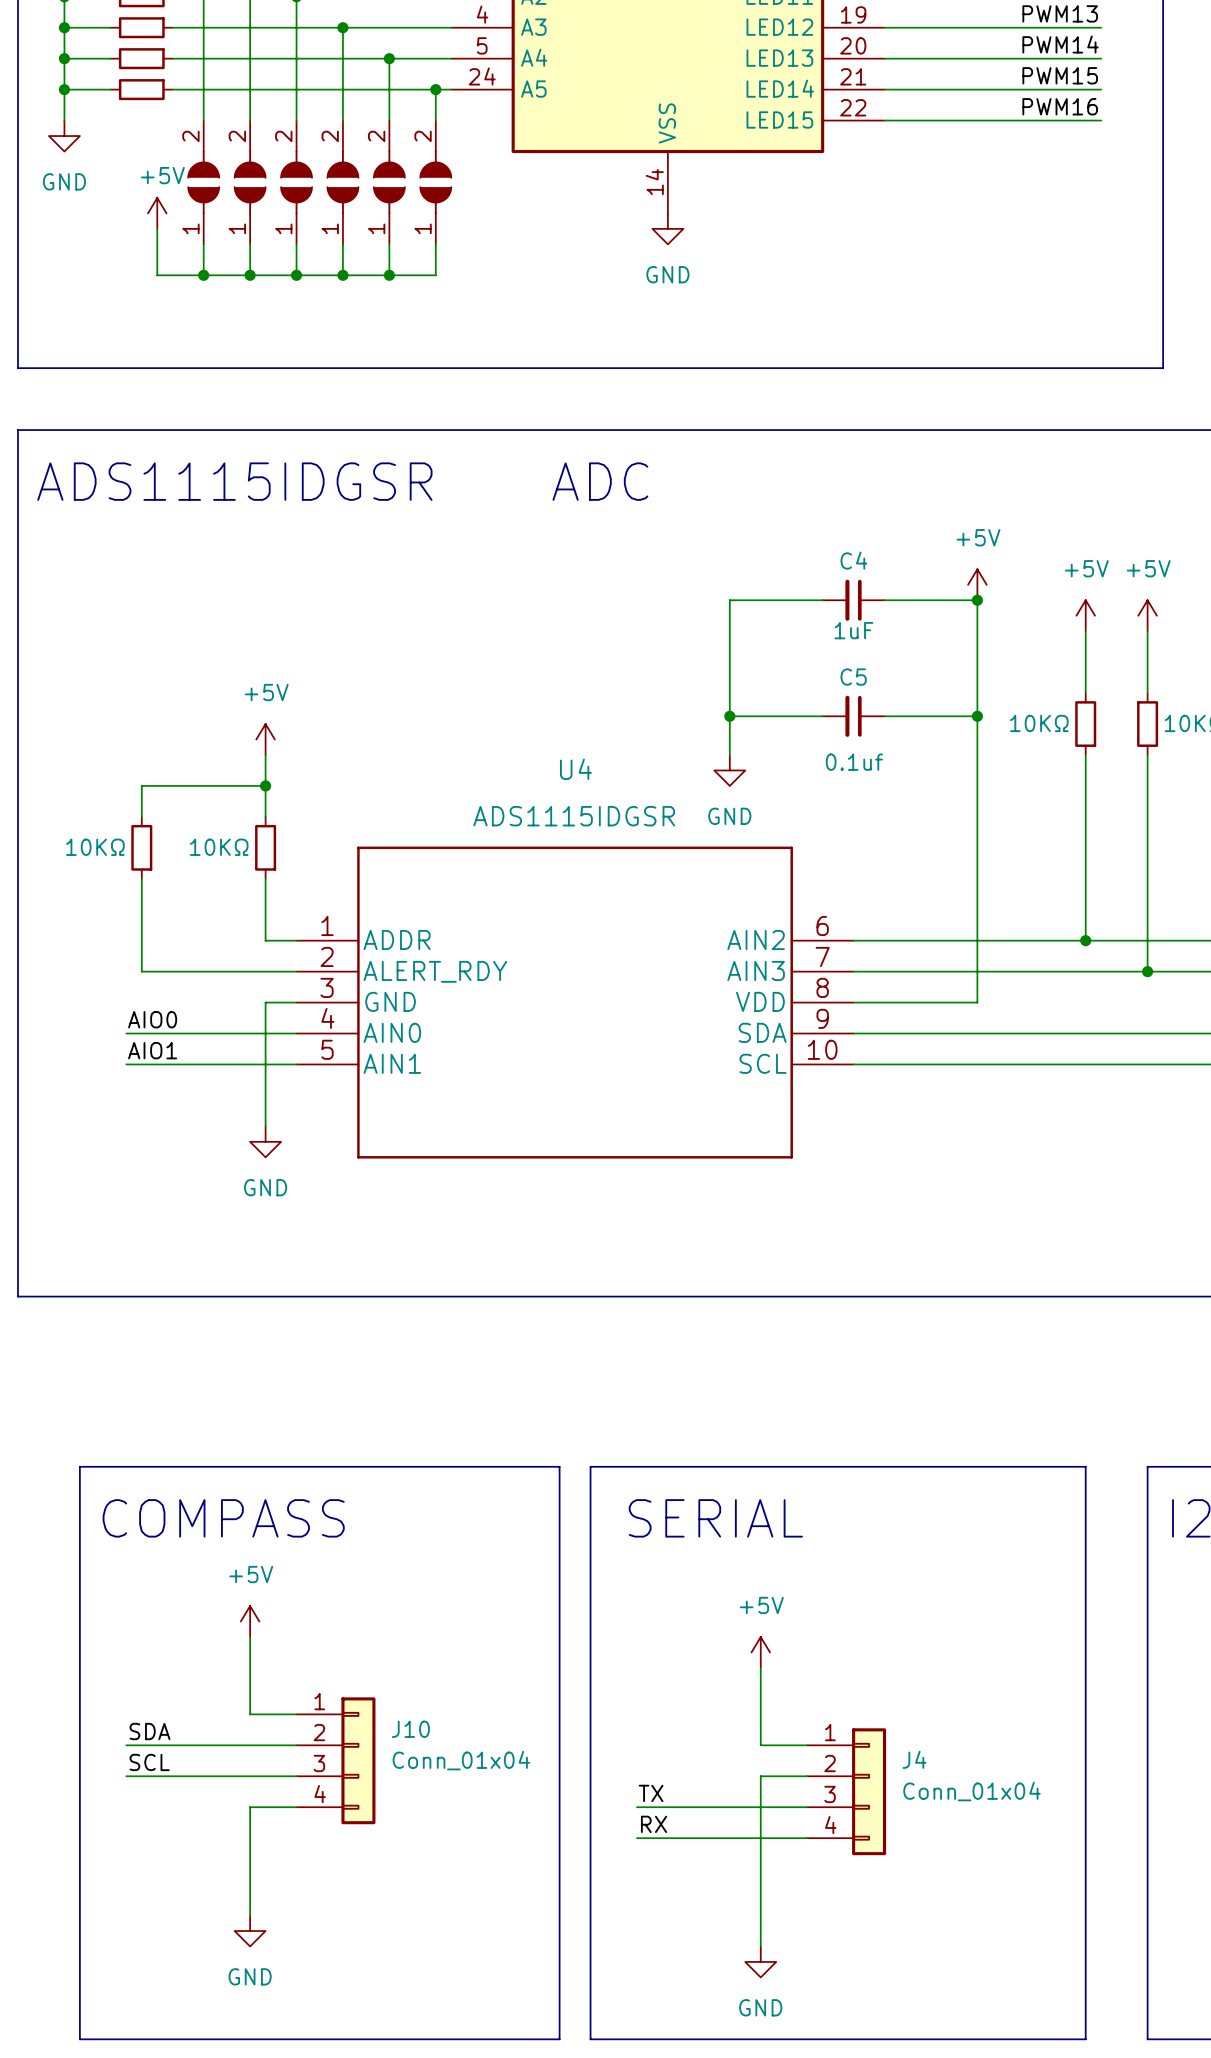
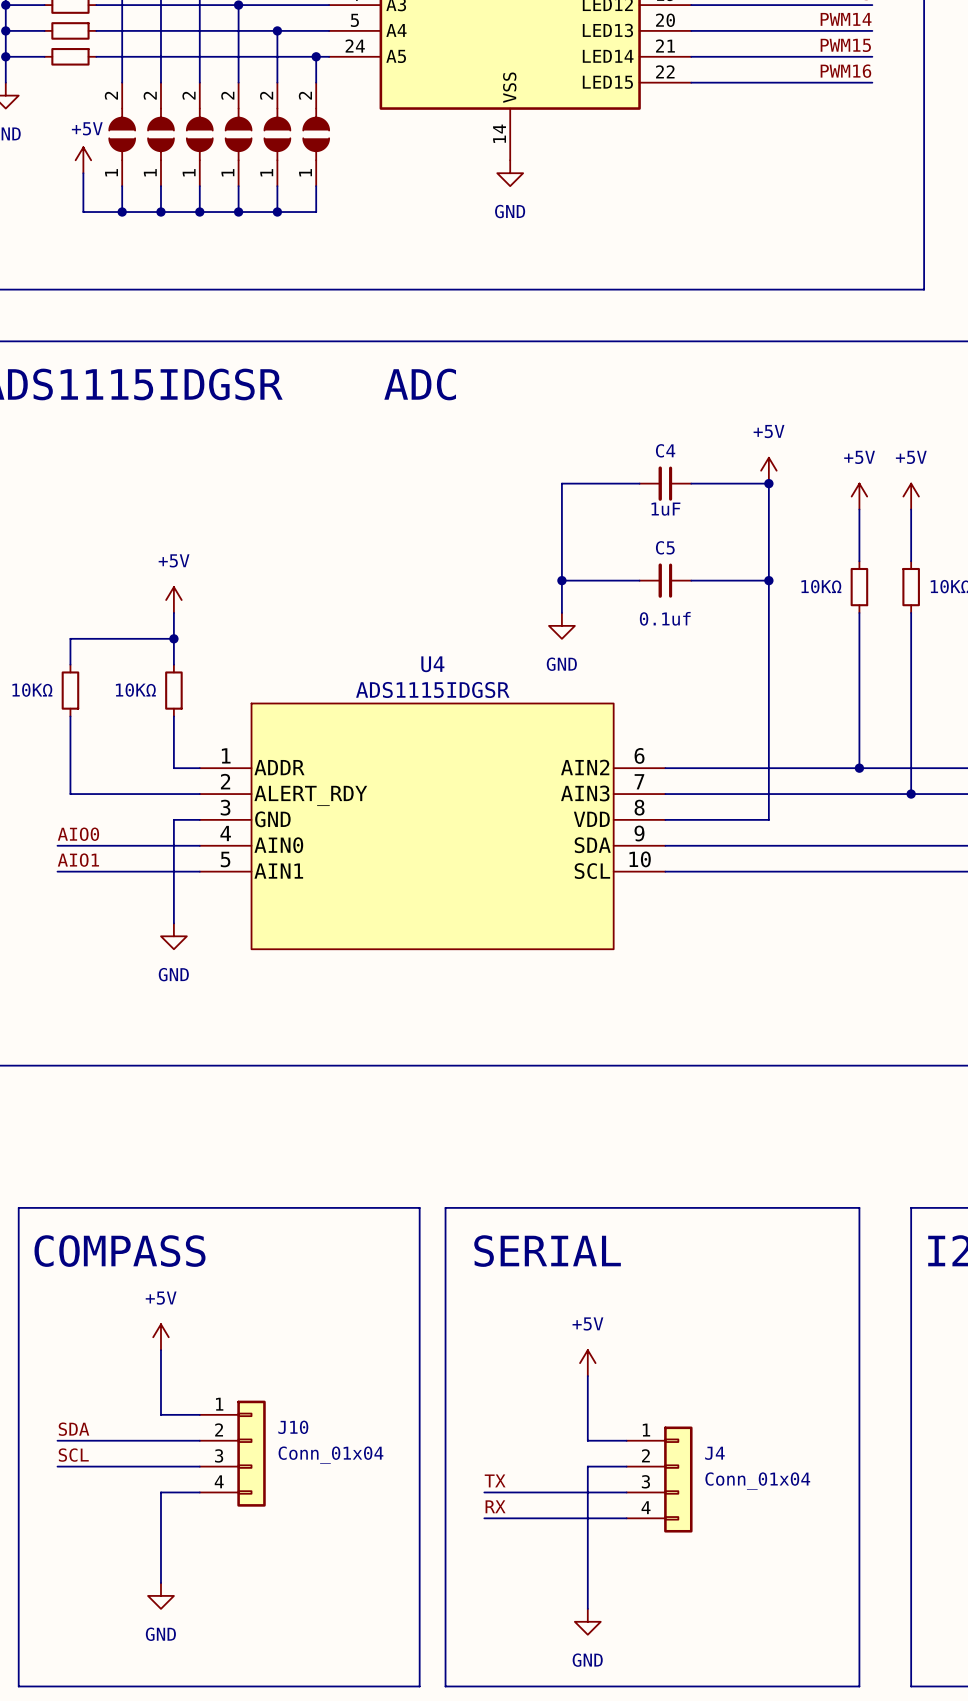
U4 name position: U4 (575, 769) -> U4 (432, 664)
U4 symbol: [296, 846, 854, 1159] -> [199, 703, 666, 950]

